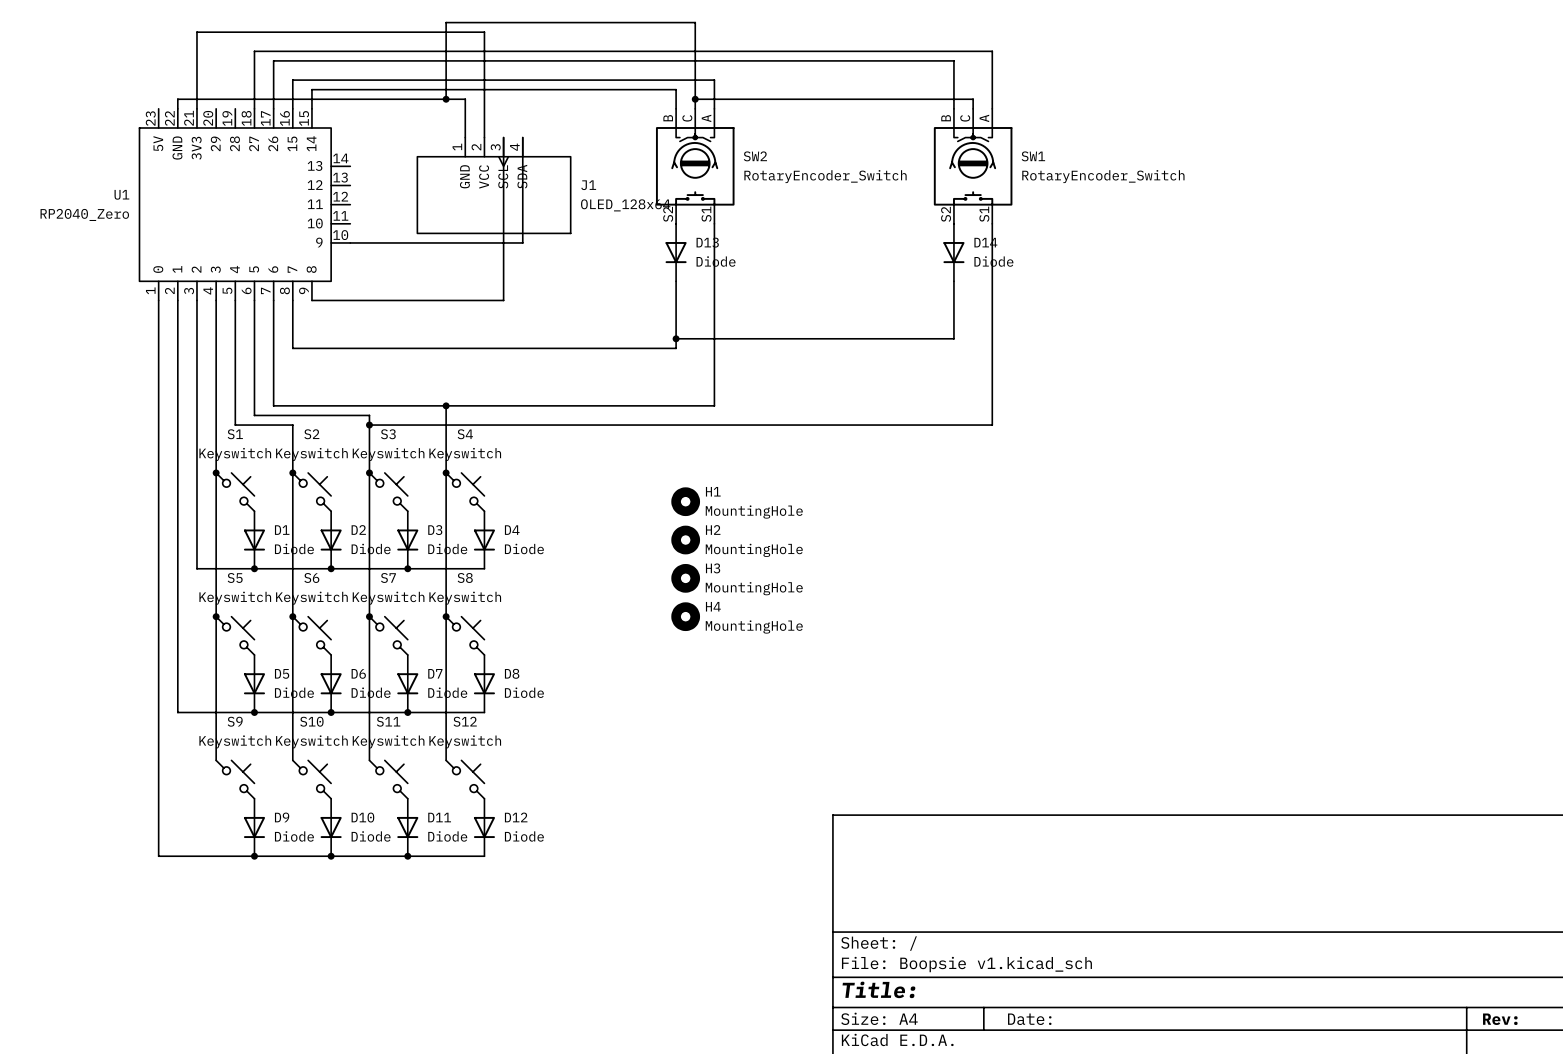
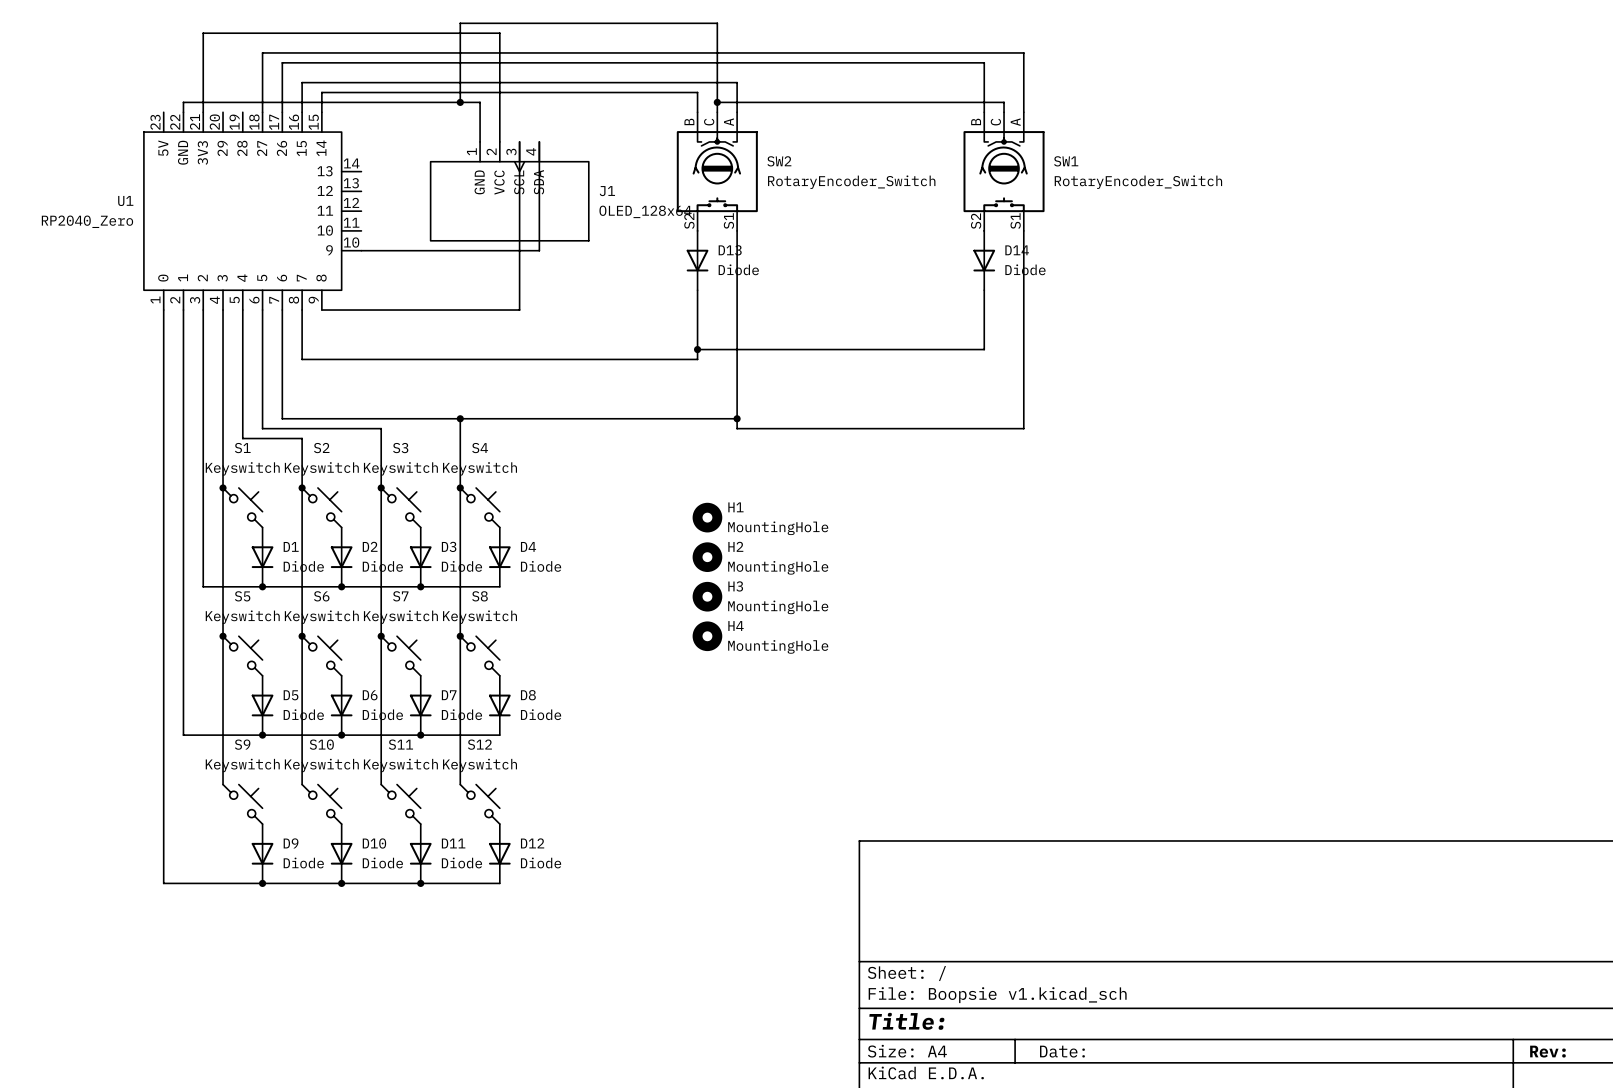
junction: none -> (737, 418)
wire: (992, 415) (992, 425) (369, 425) -> (1023, 428) (737, 428) (737, 418)
junction: (369, 425) -> none

